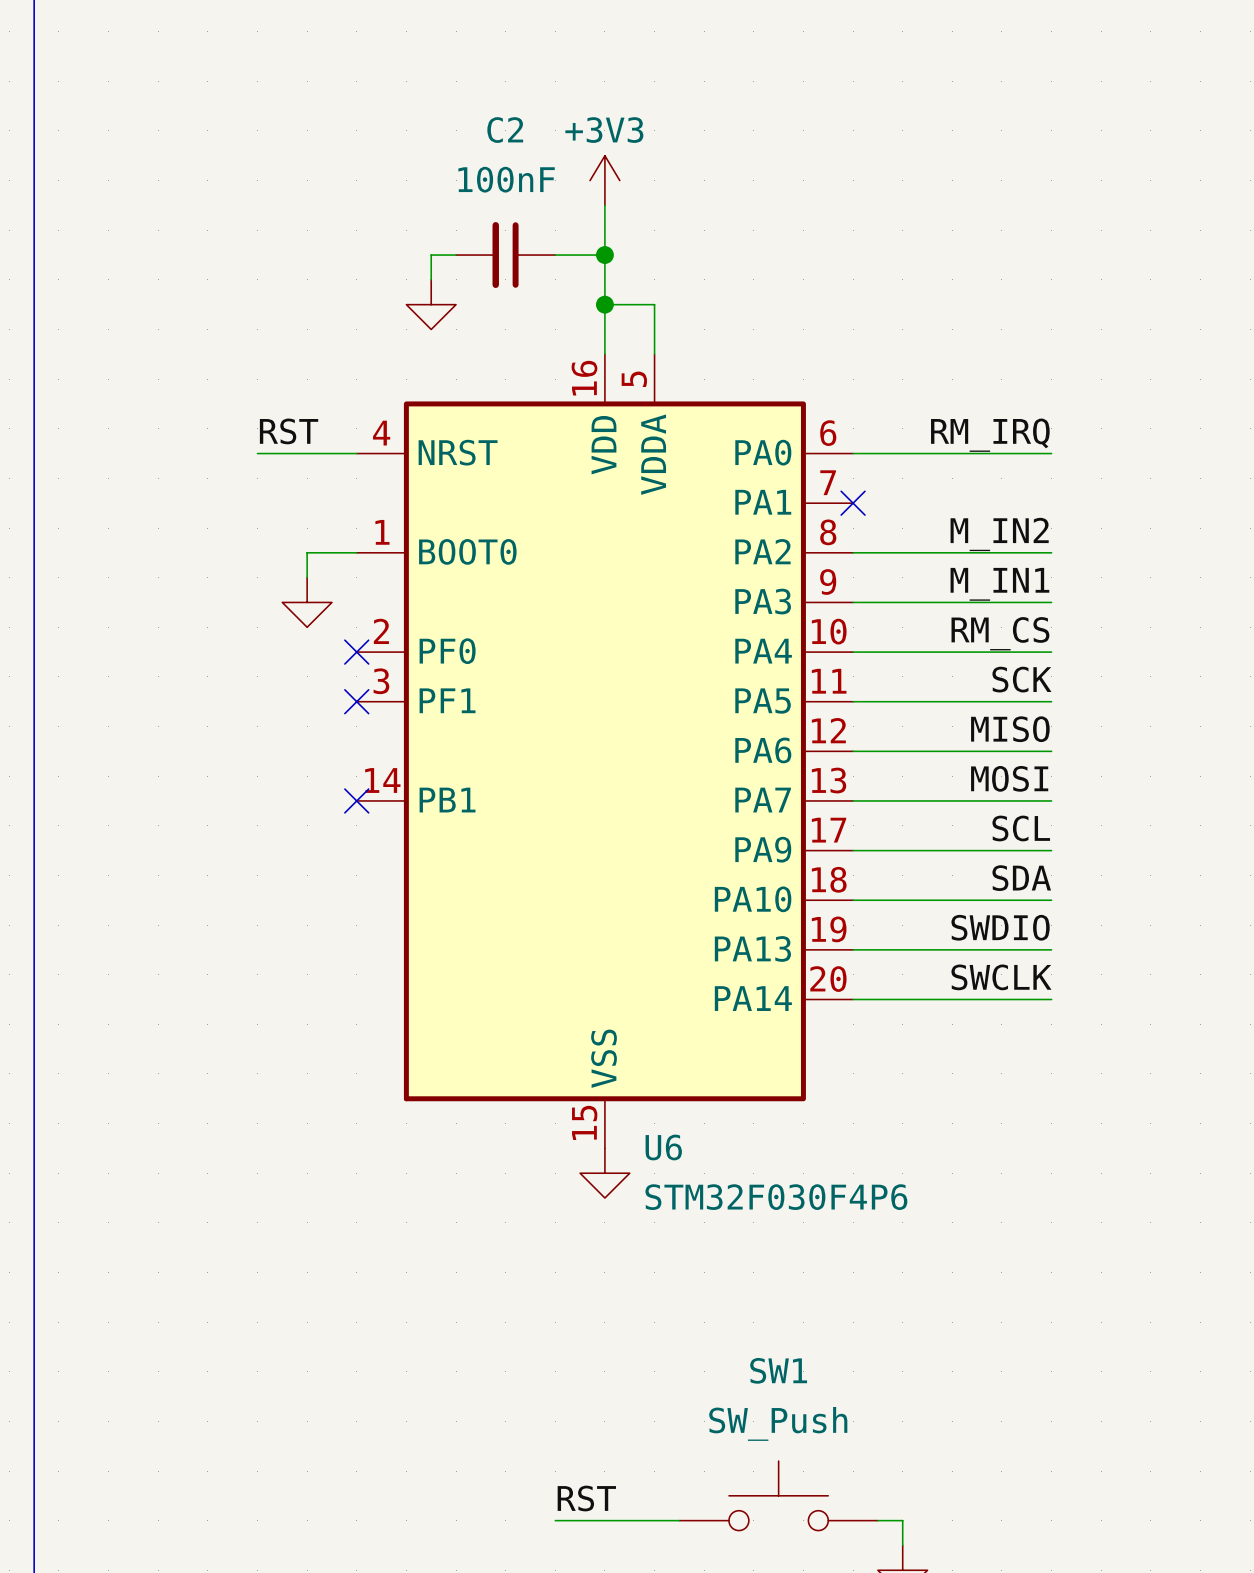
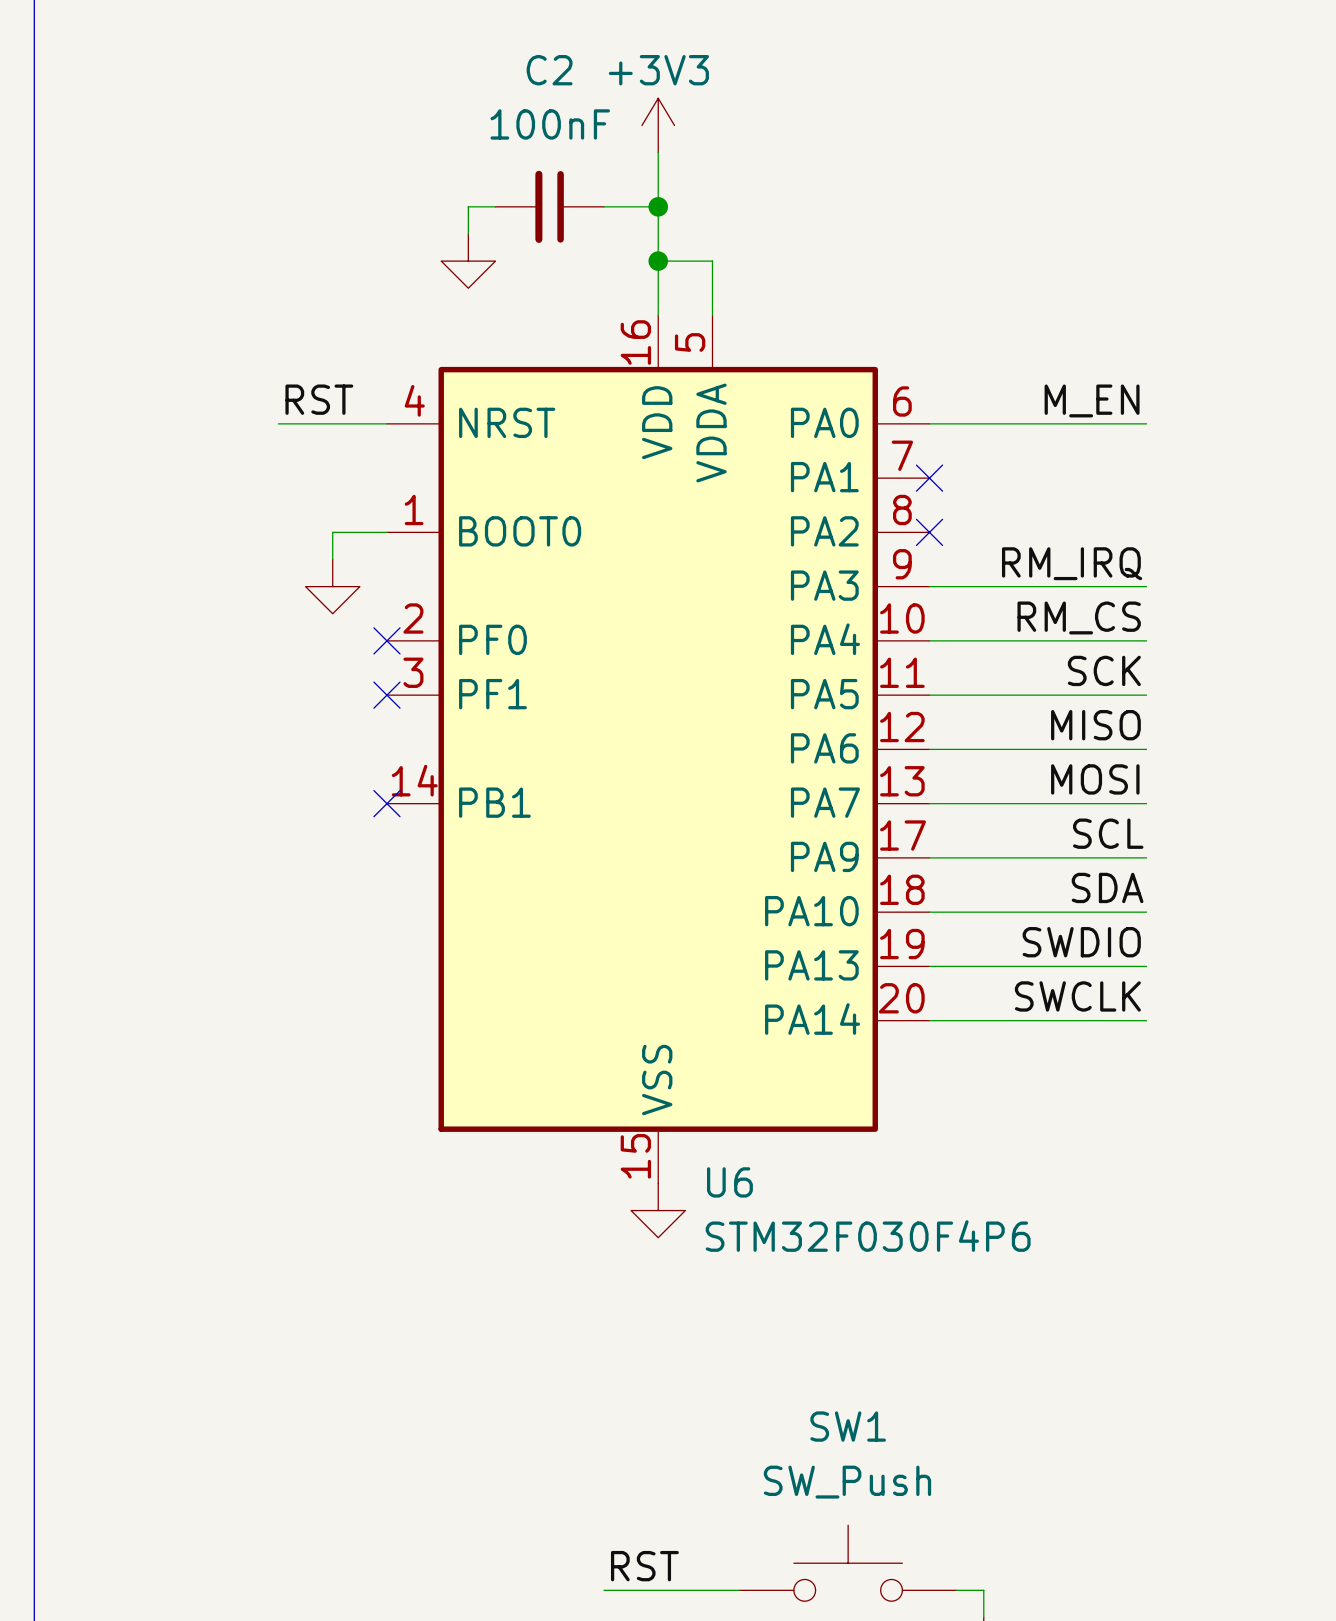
label: RM_IRQ (990, 435) -> M_EN (1092, 400)
label: M_IN2 (999, 534) -> none
wire: (853, 552) (1051, 552) -> none
no-connect mark: none -> (929, 532)
label: M_IN1 (999, 584) -> RM_IRQ (1072, 563)

